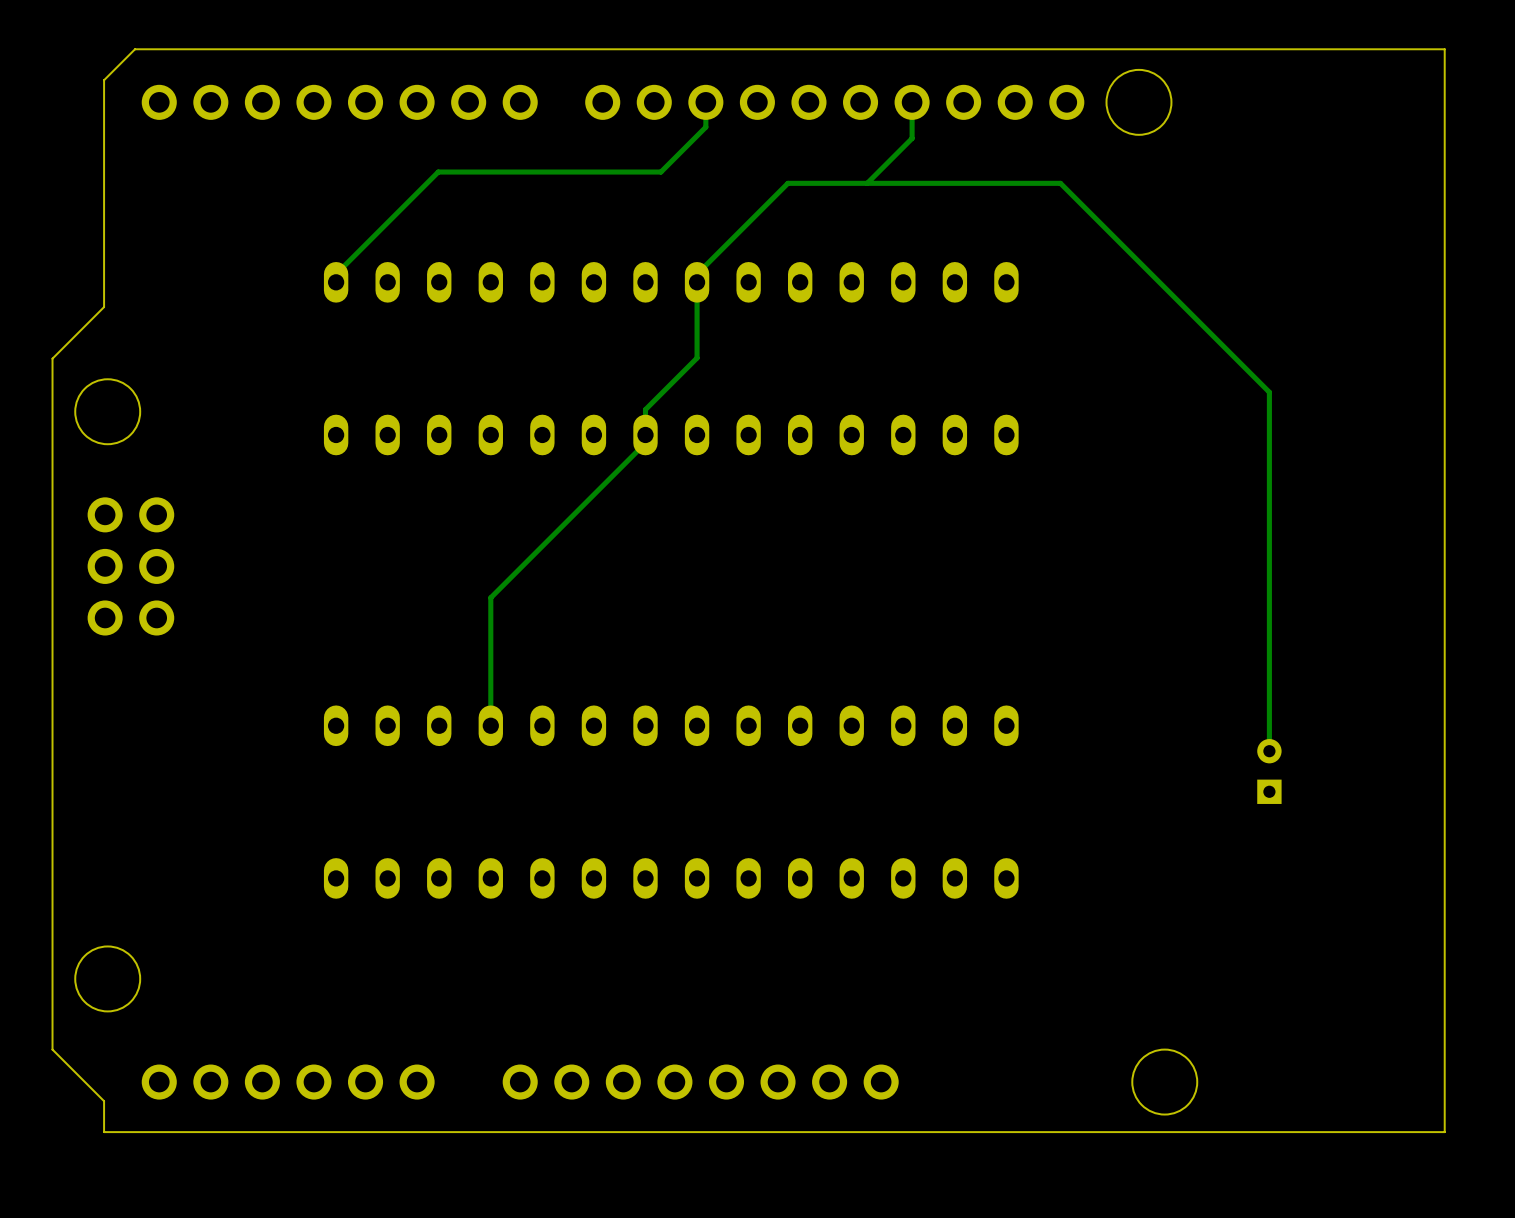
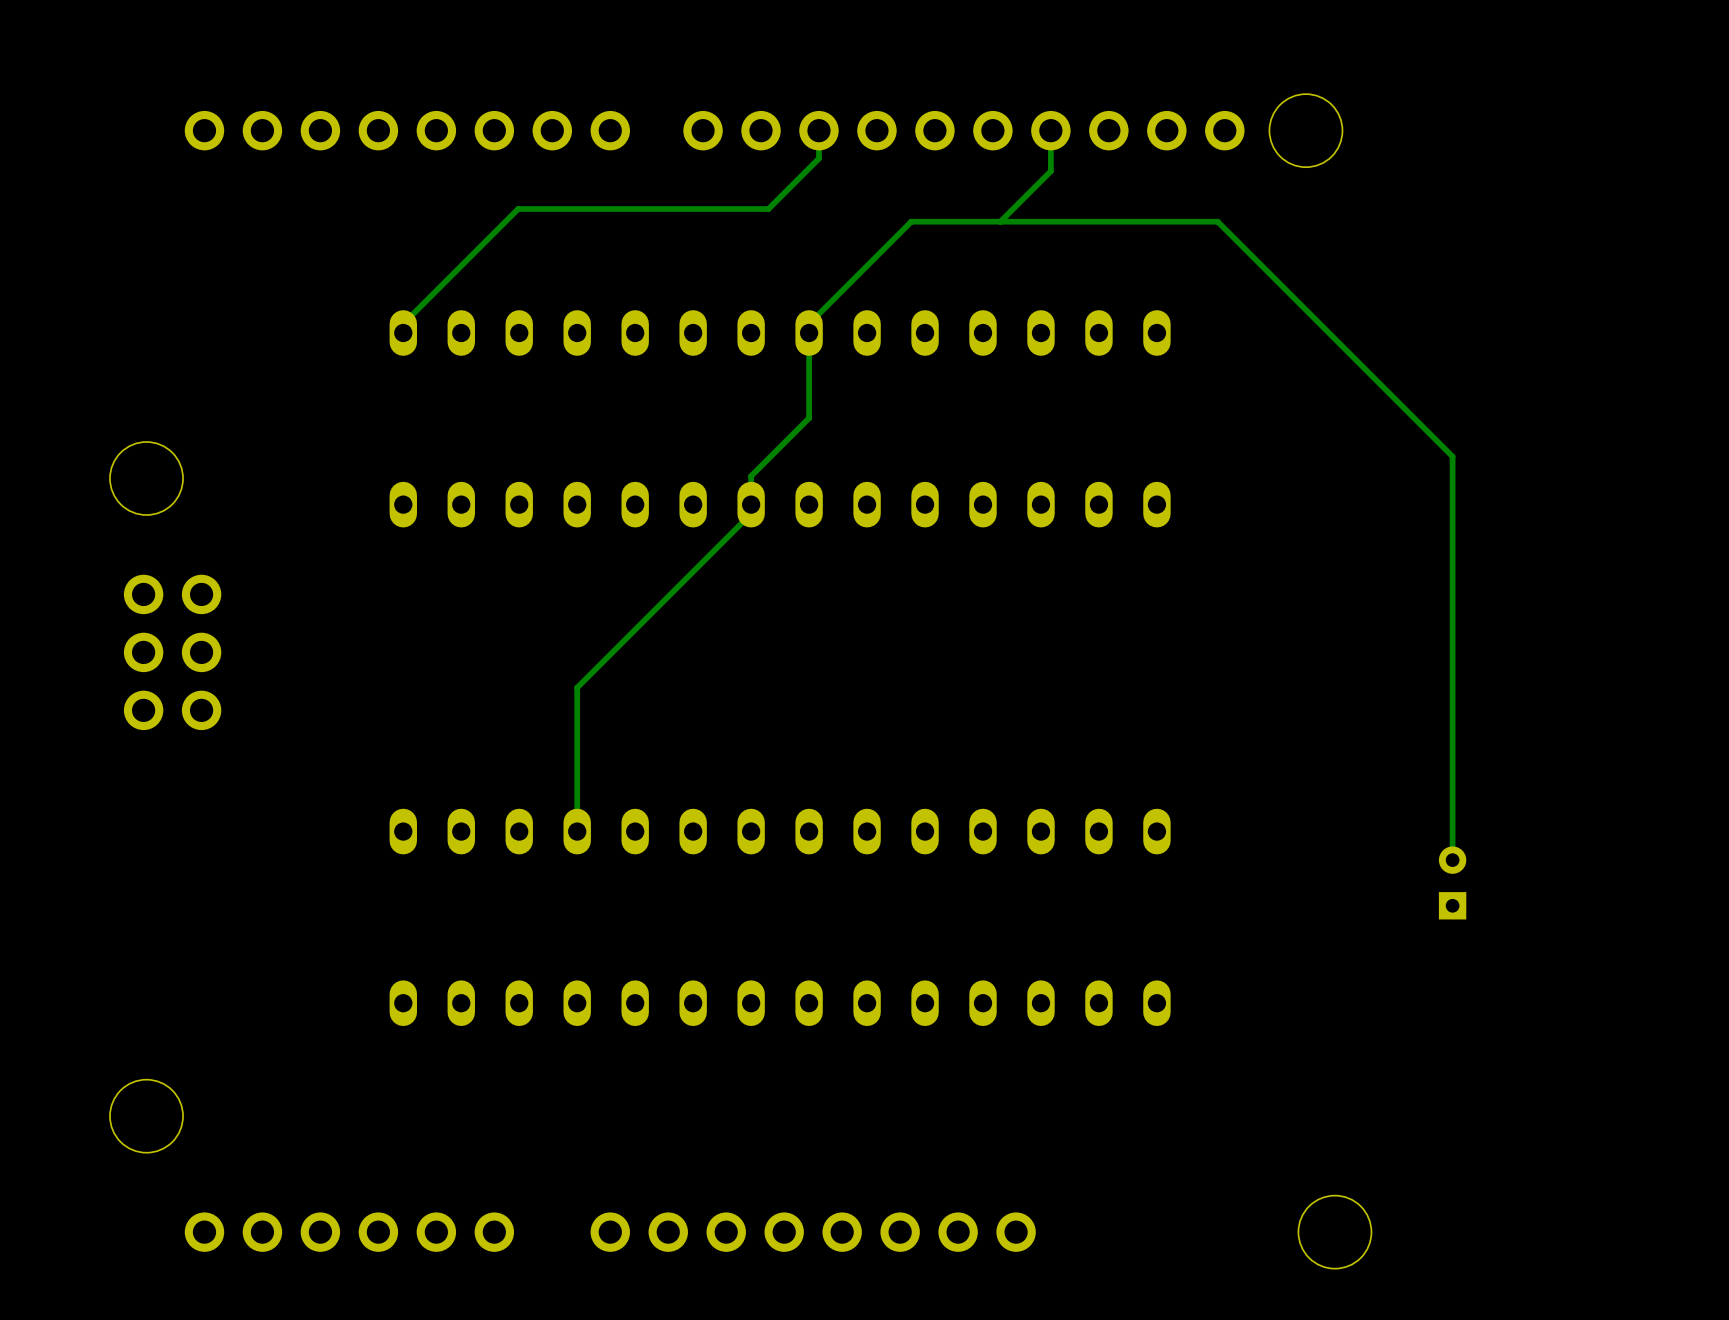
board edge: (1444, 49) (135, 49) (104, 80) (104, 307) (52, 358) (52, 1049) (104, 1101) (104, 1132) (1444, 1132) (1444, 49) -> none

